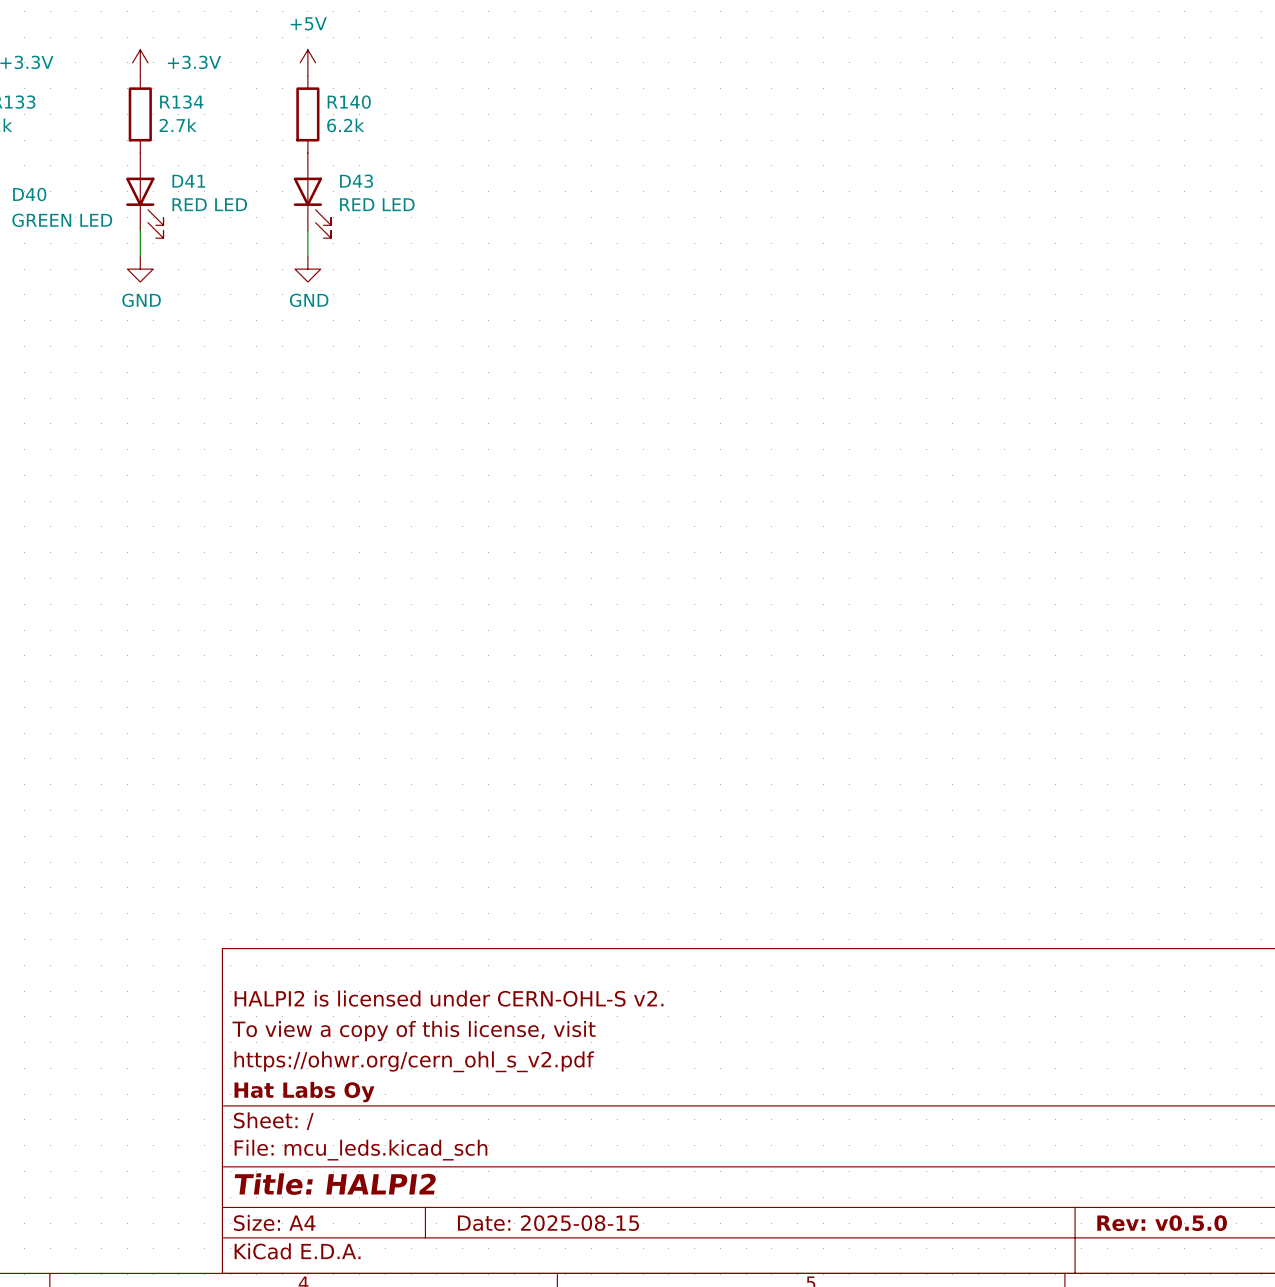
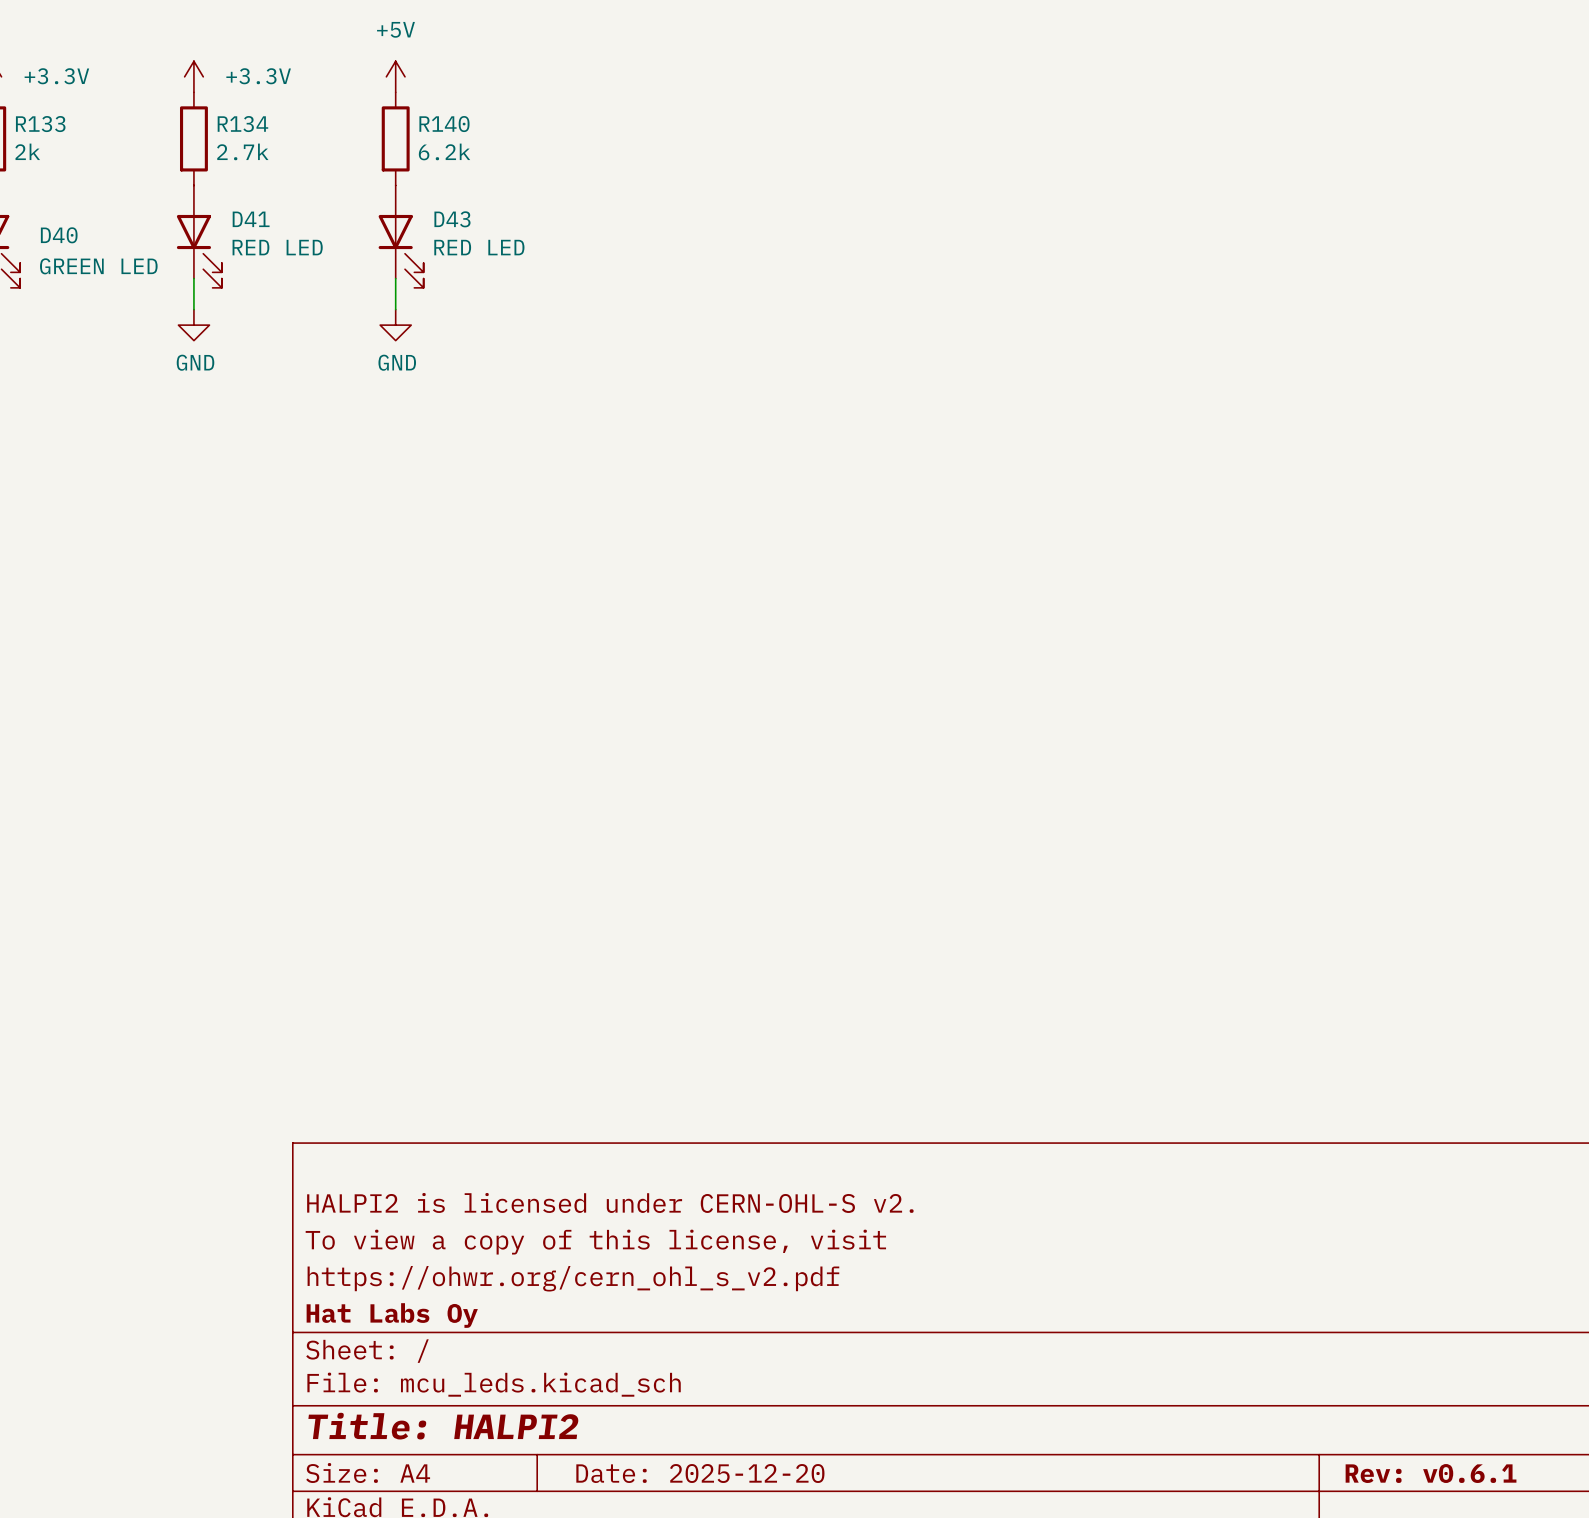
title block: Date: 2025-08-15 (548, 1223) -> Date: 2025-12-20 (700, 1473)
title block: Rev: v0.5.0 (1162, 1223) -> Rev: v0.6.1 (1431, 1473)

